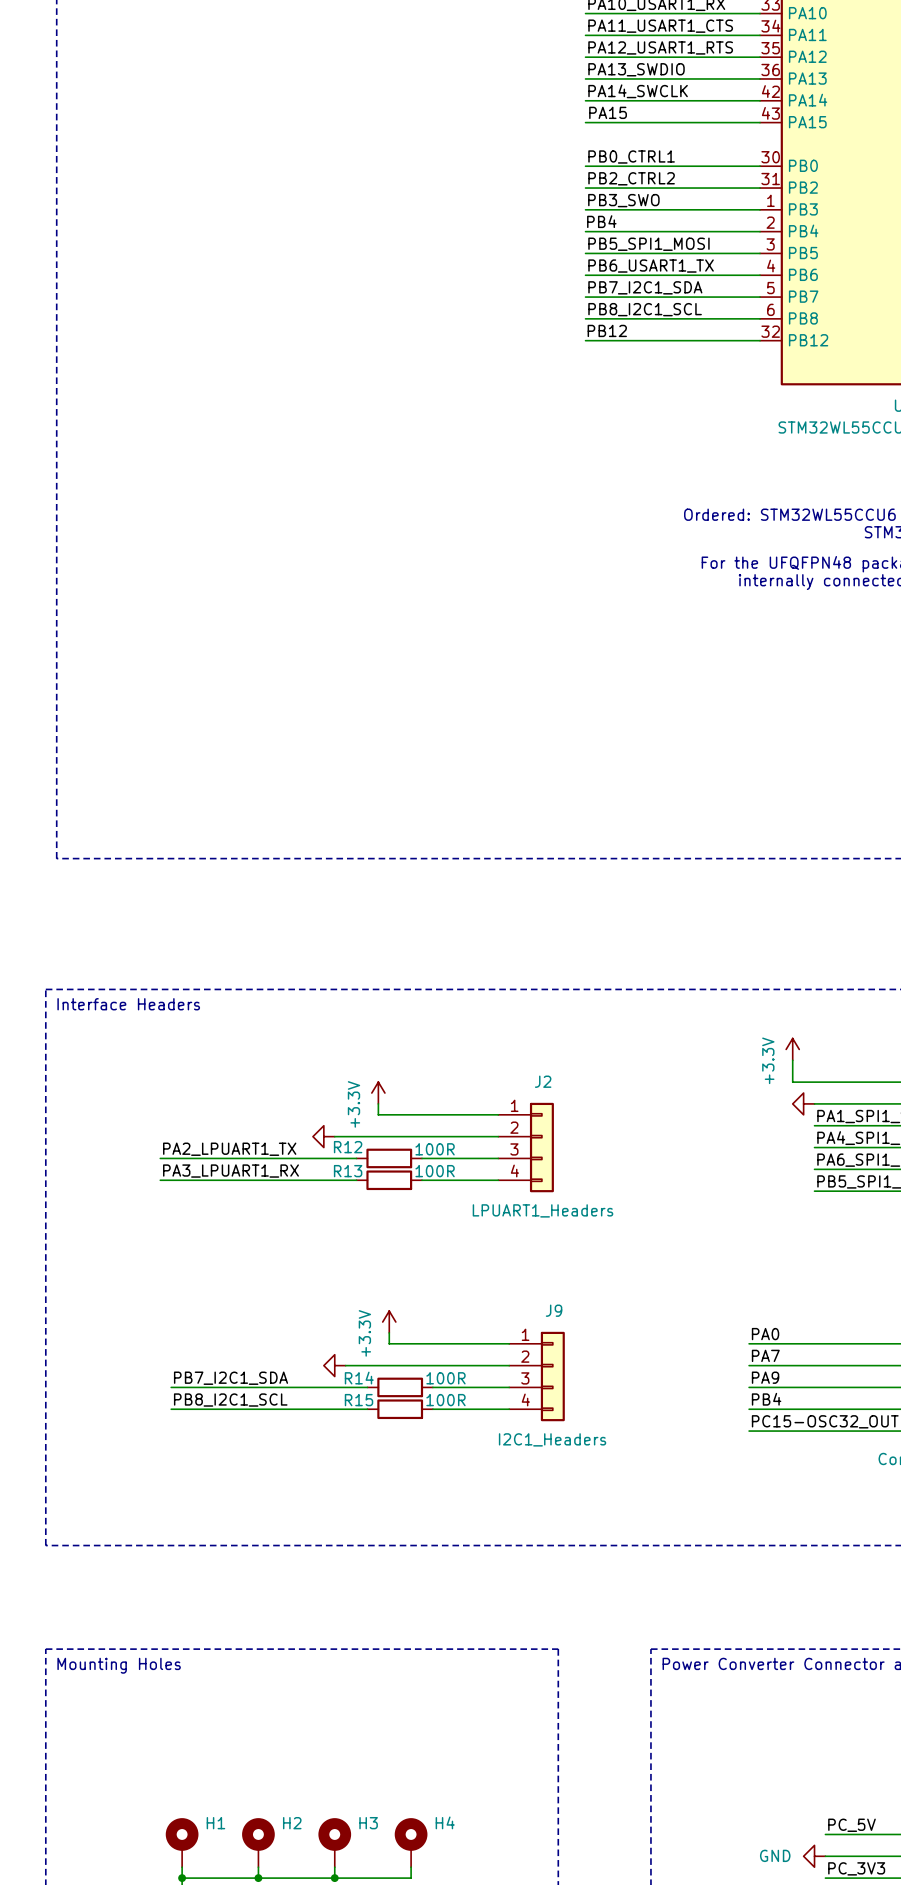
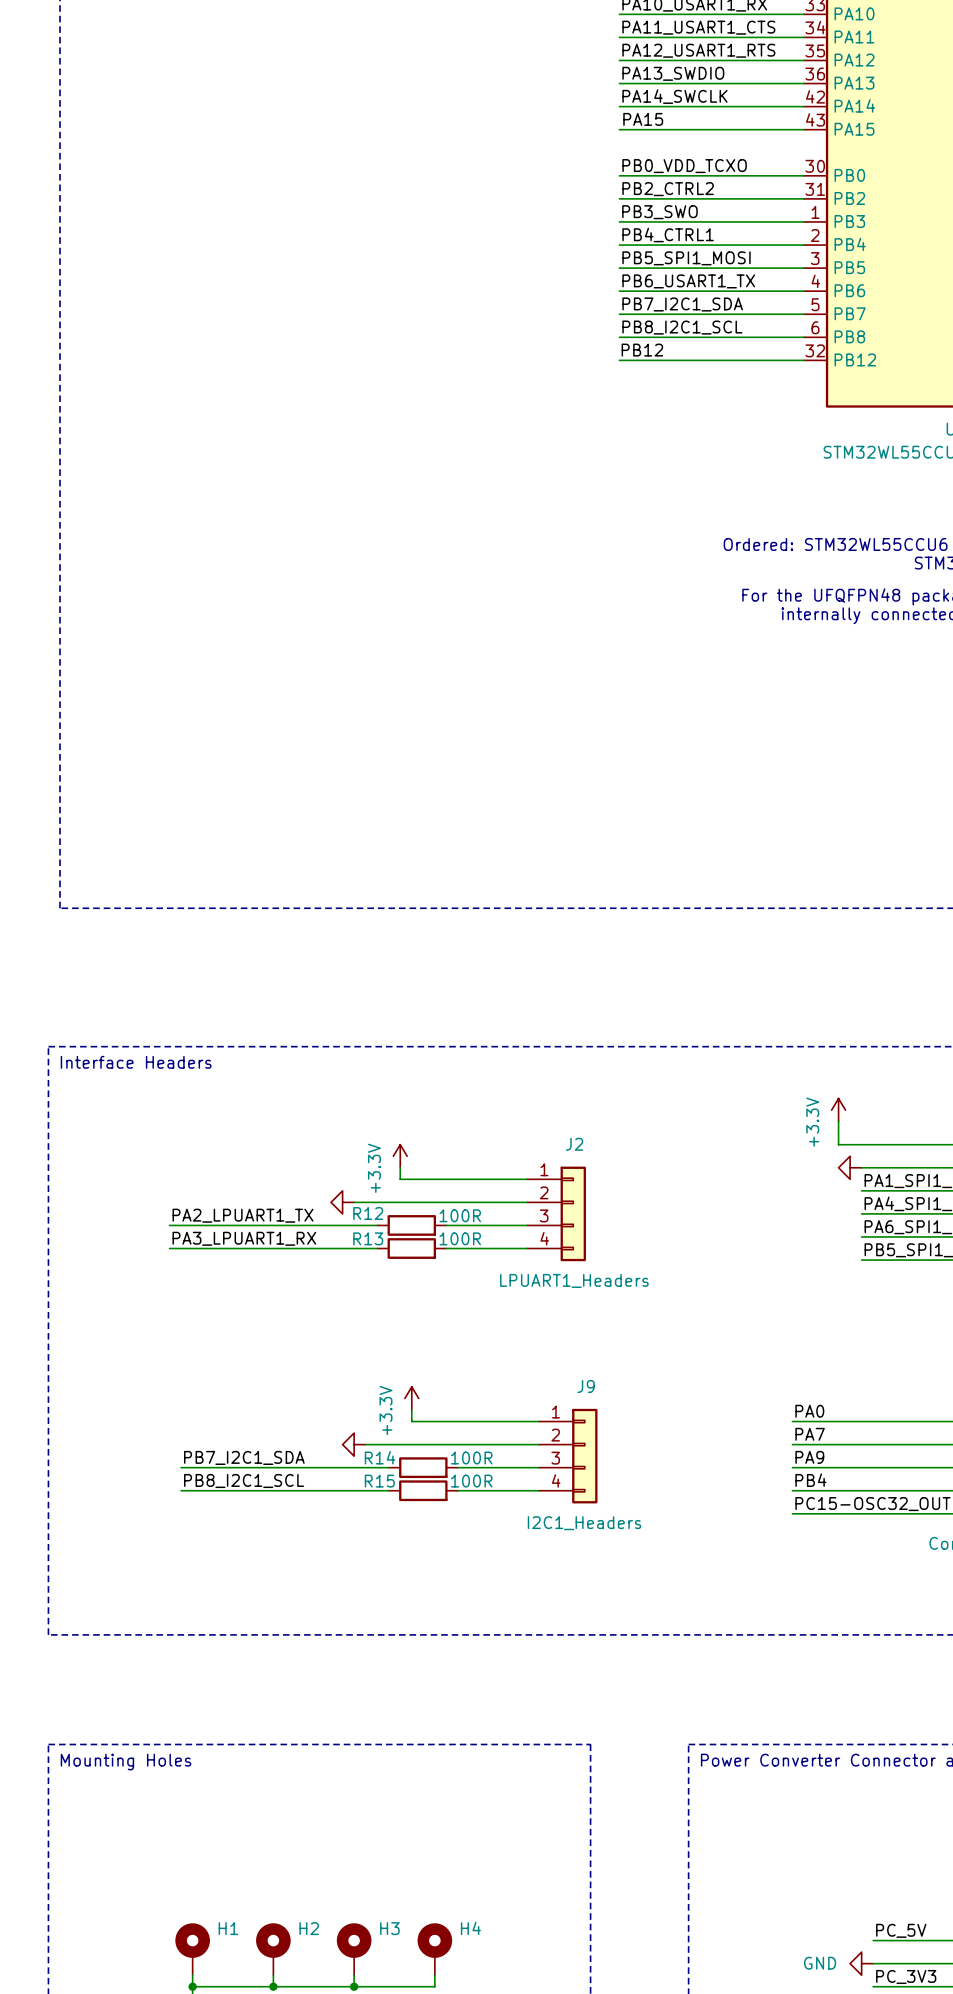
label: PB0_CTRL1 (631, 157) -> PB0_VDD_TCXO (684, 166)
label: PB4 (601, 221) -> none
label: none -> PB4_CTRL1 (668, 235)

